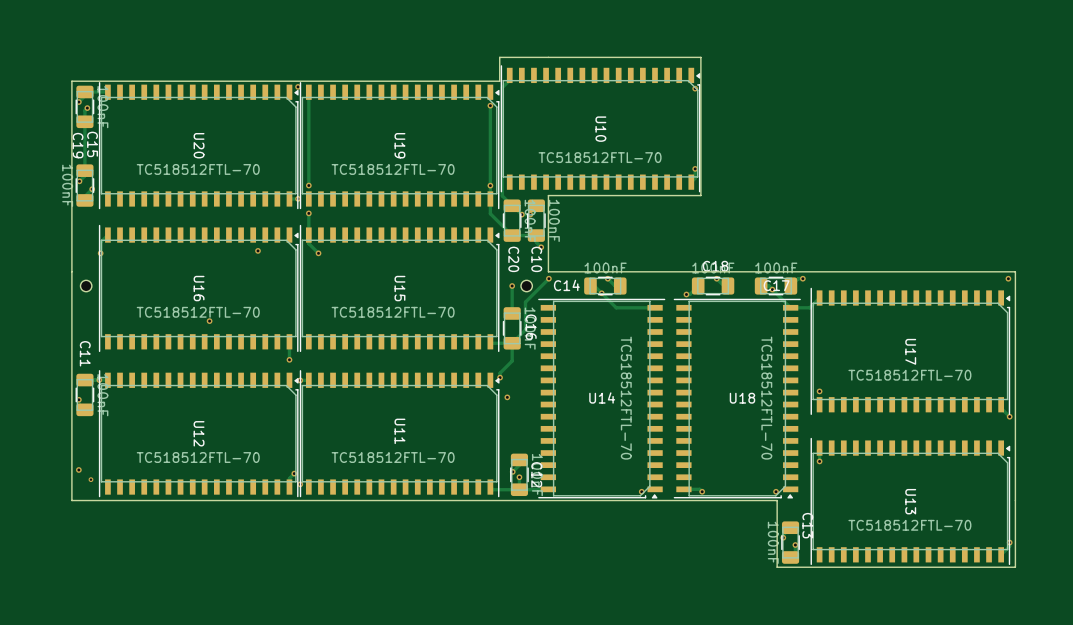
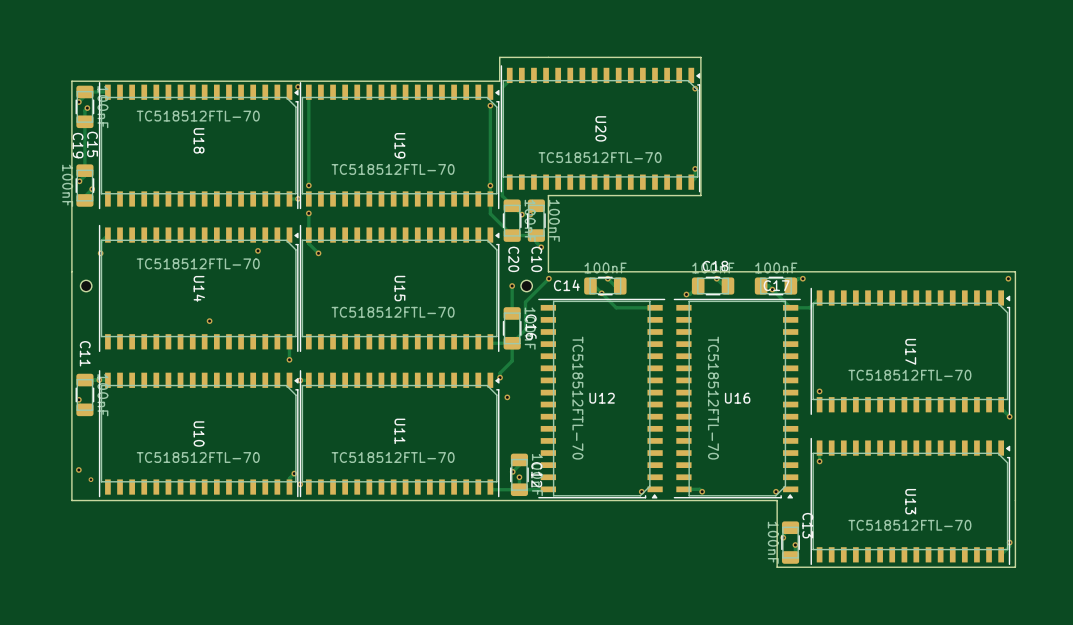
U10 name: U10 (600, 129) -> U20 (600, 128)
U20 name: U20 (199, 145) -> U18 (199, 140)
U20 value position: TC518512FTL-70 (198, 169) -> TC518512FTL-70 (198, 116)
U16 name: U16 (199, 288) -> U14 (199, 288)
U16 value position: TC518512FTL-70 (198, 312) -> TC518512FTL-70 (198, 263)
U14 name: U14 (602, 397) -> U12 (602, 398)
U14 value position: TC518512FTL-70 (626, 398) -> TC518512FTL-70 (577, 398)
U18 name: U18 (742, 398) -> U16 (737, 398)
U18 value position: TC518512FTL-70 (766, 398) -> TC518512FTL-70 (713, 398)
U12 name: U12 (199, 433) -> U10 (199, 434)

